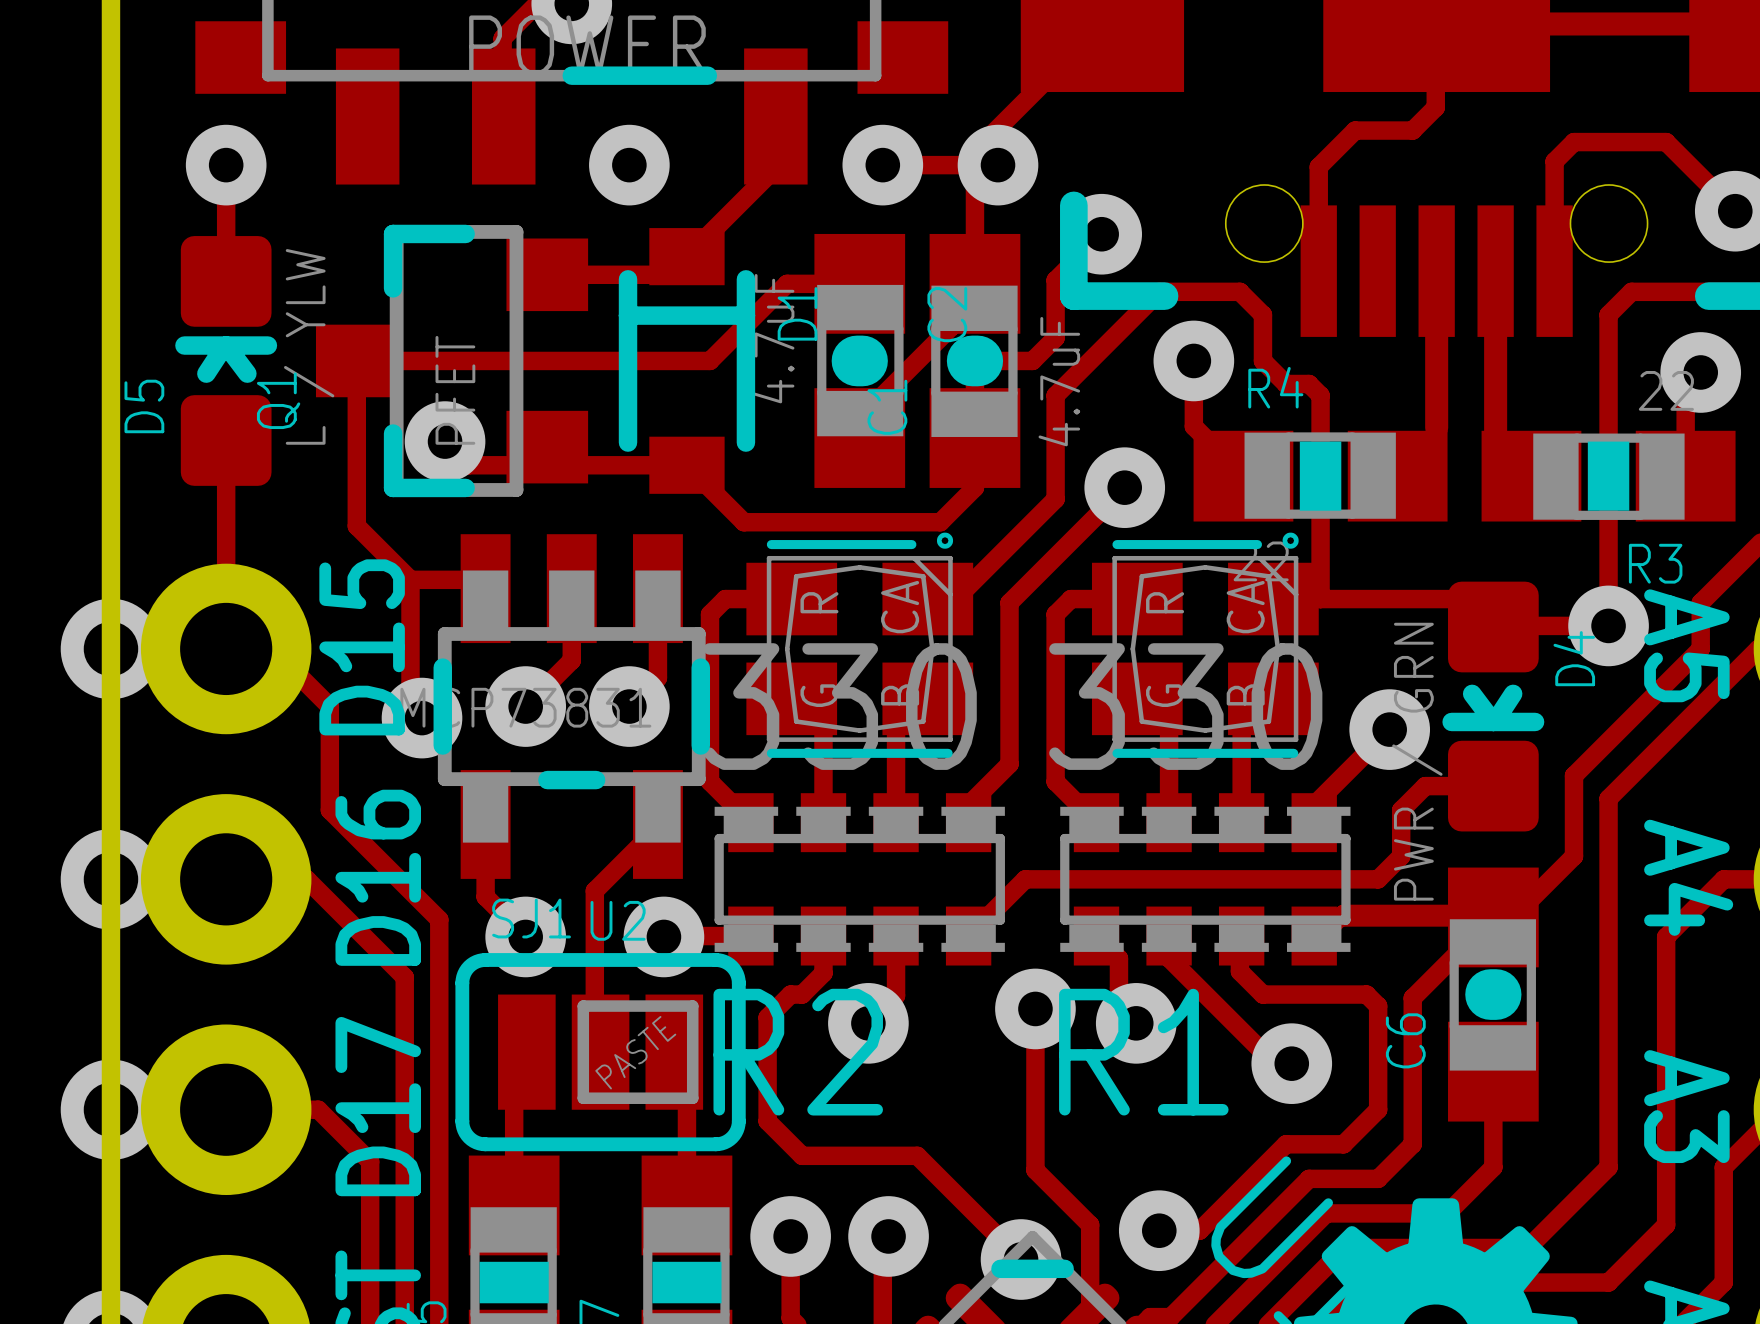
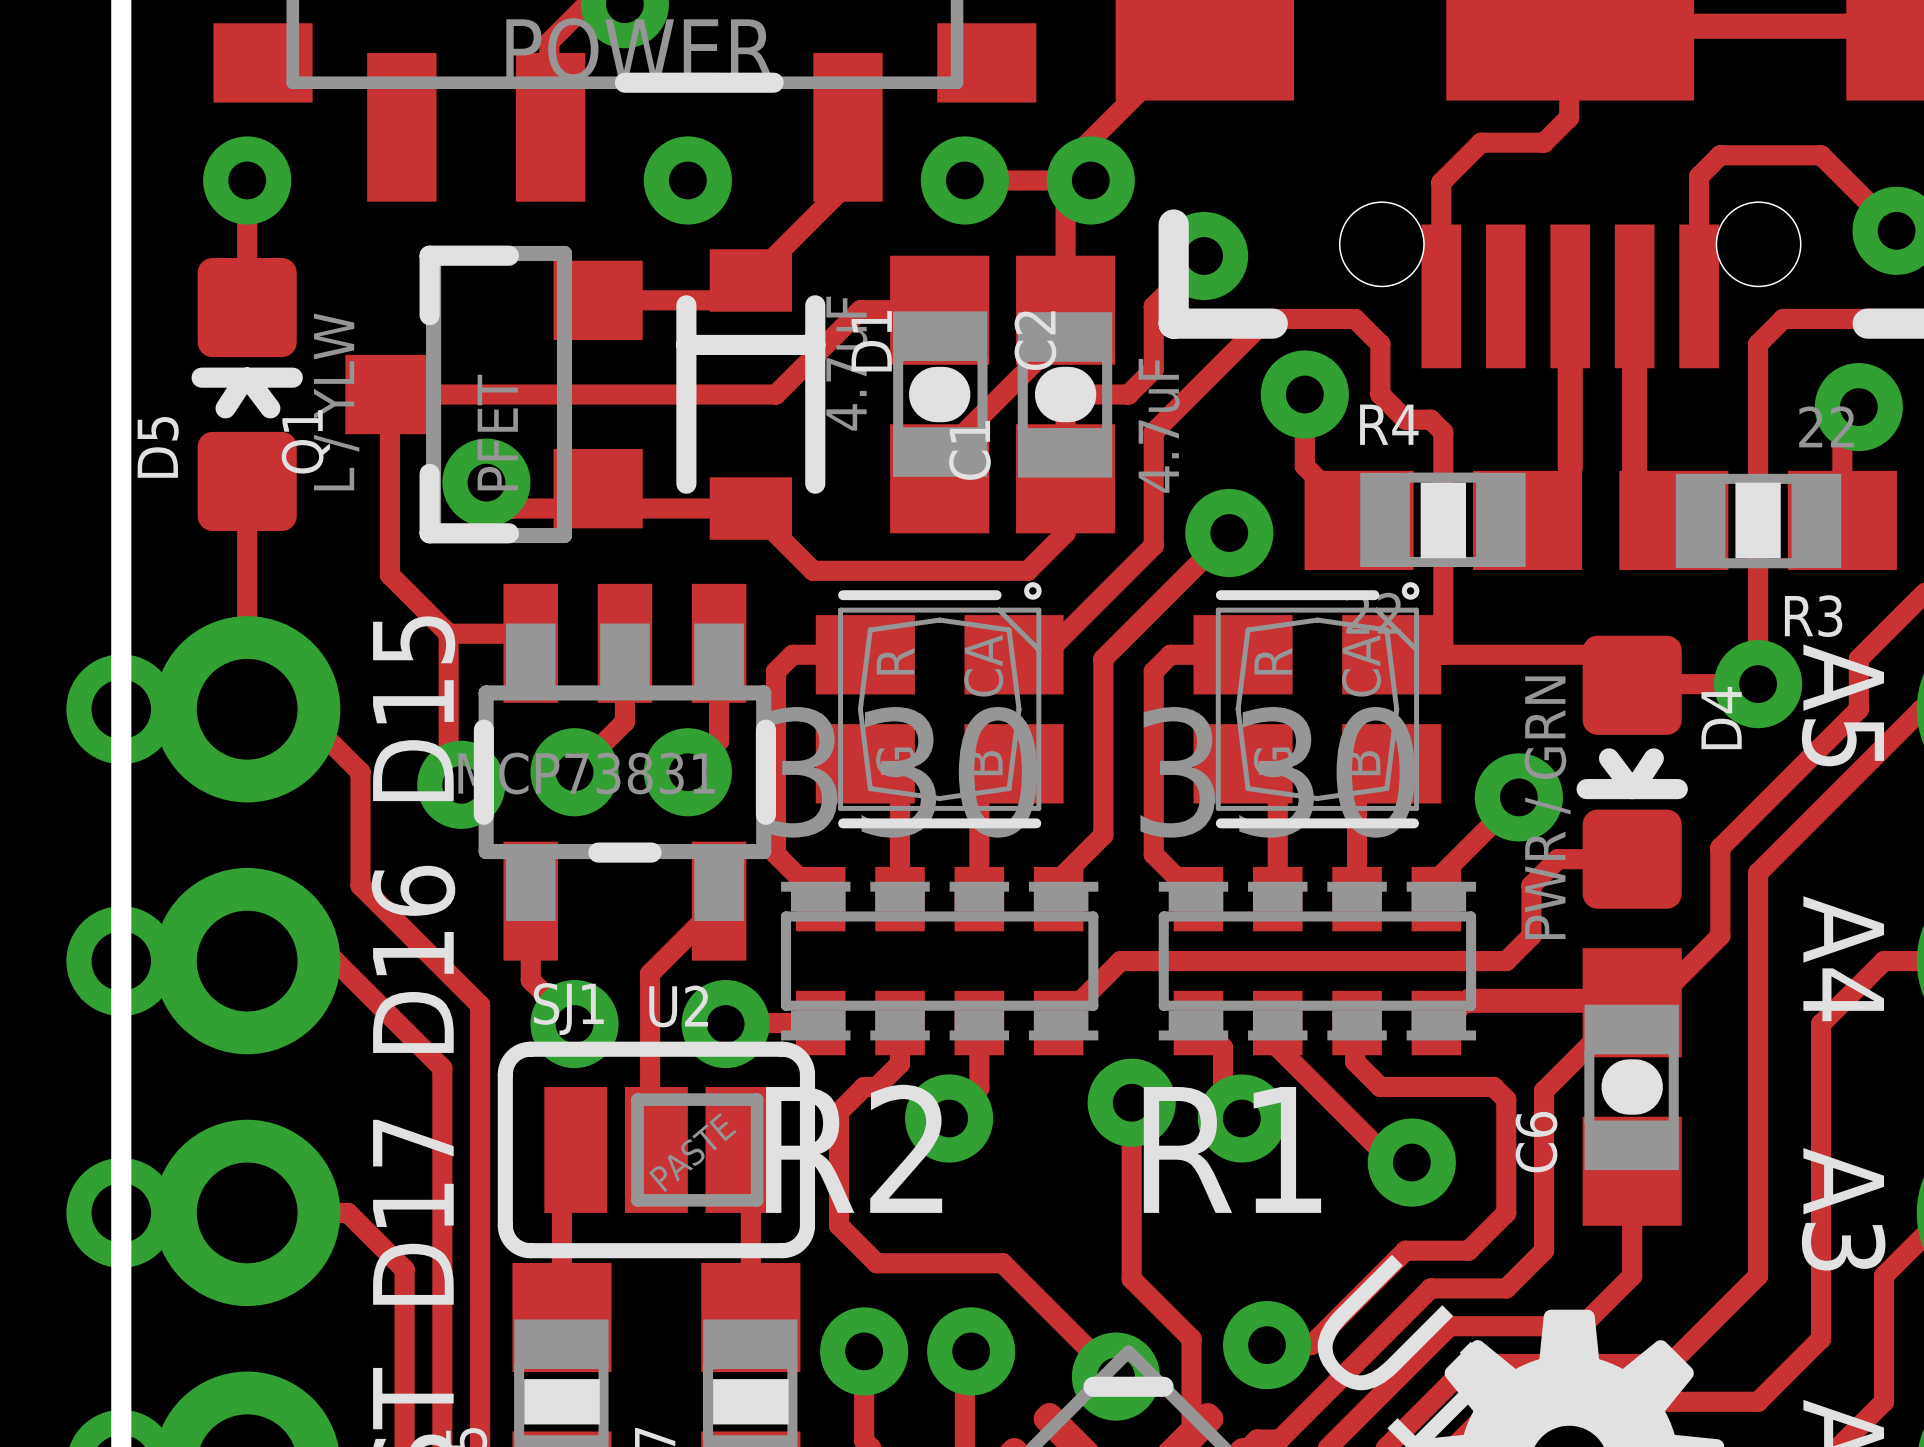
text position: D15 (362, 647) -> D15 (414, 708)

